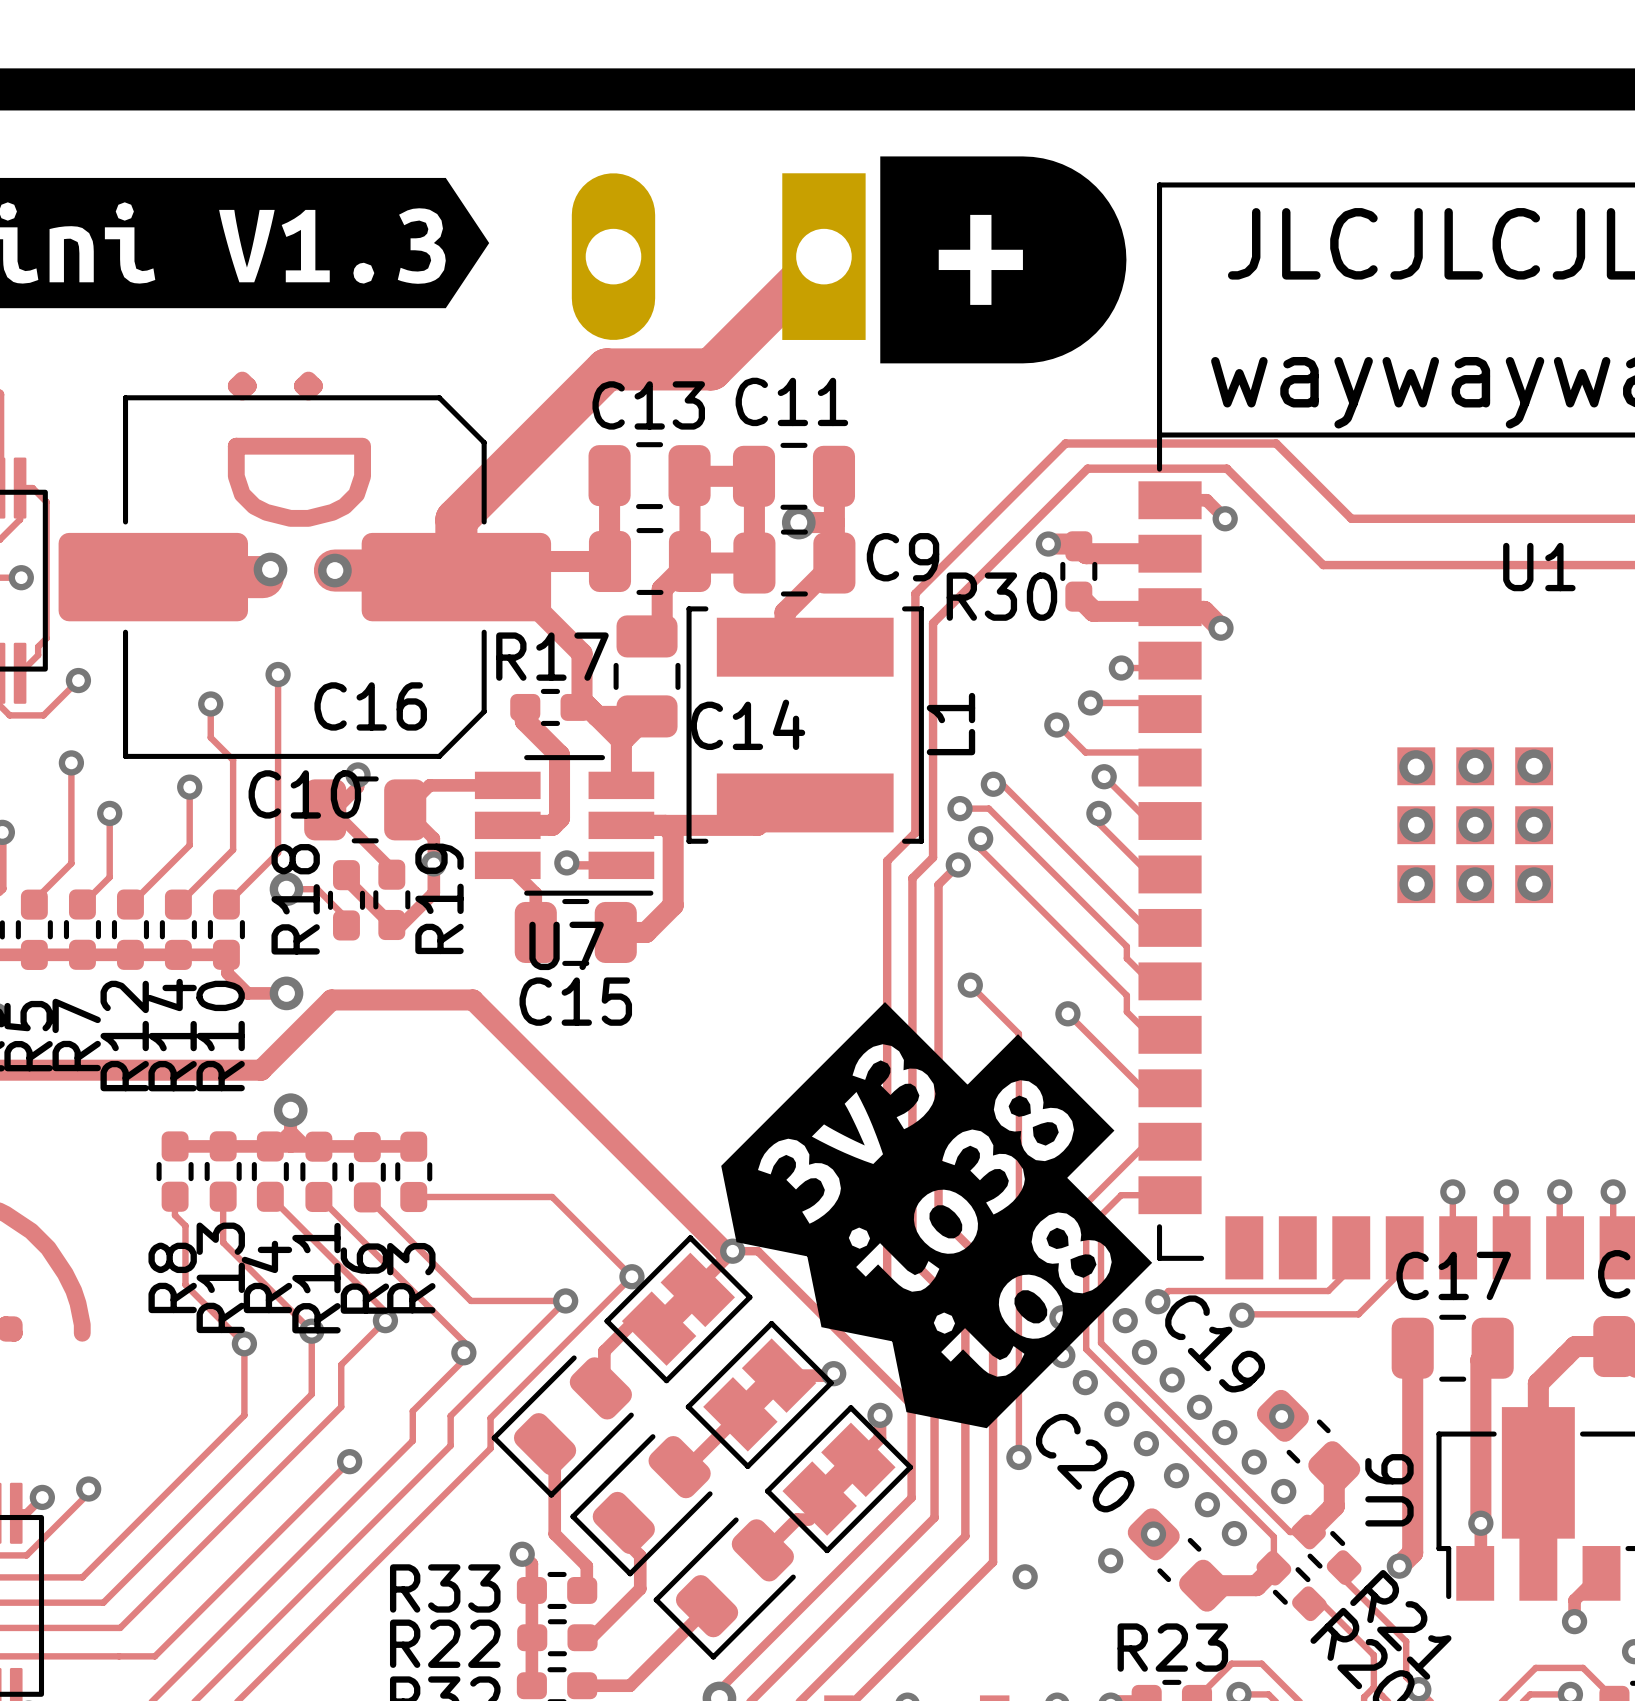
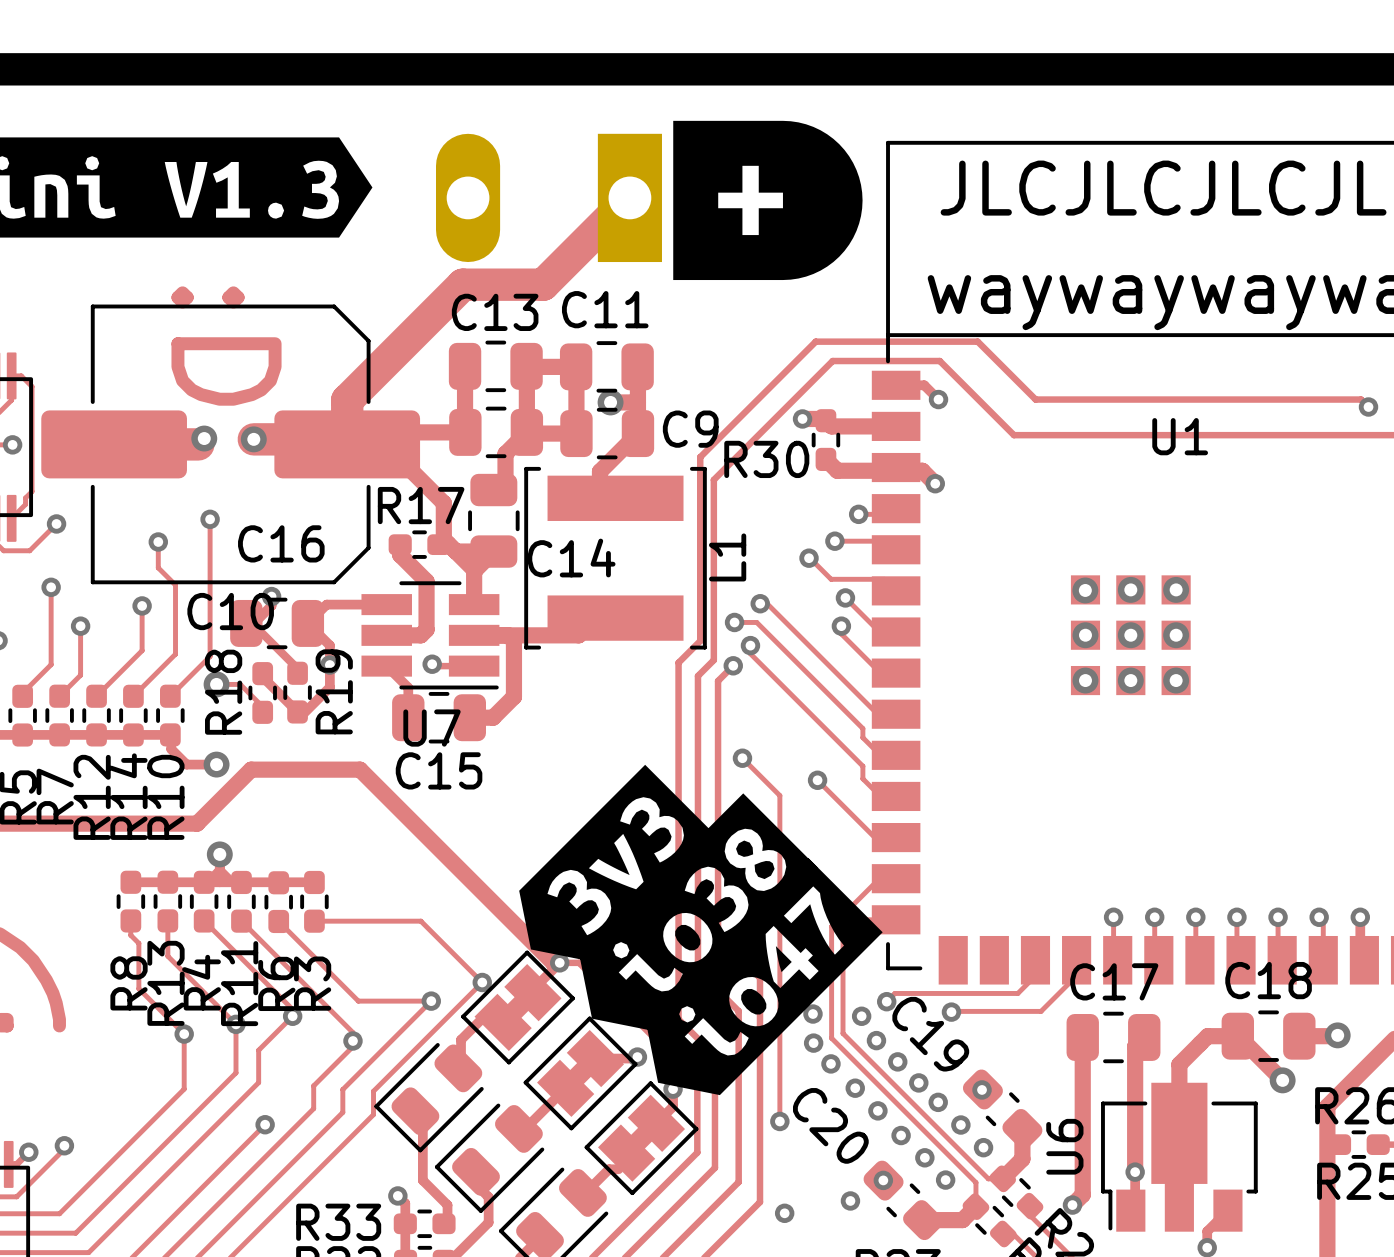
drawing position: (848, 1129) -> (617, 862)
drawing shape: [890, 1166, 1153, 1429] -> [645, 858, 883, 1096]
drawing position: (959, 1188) -> (698, 912)

